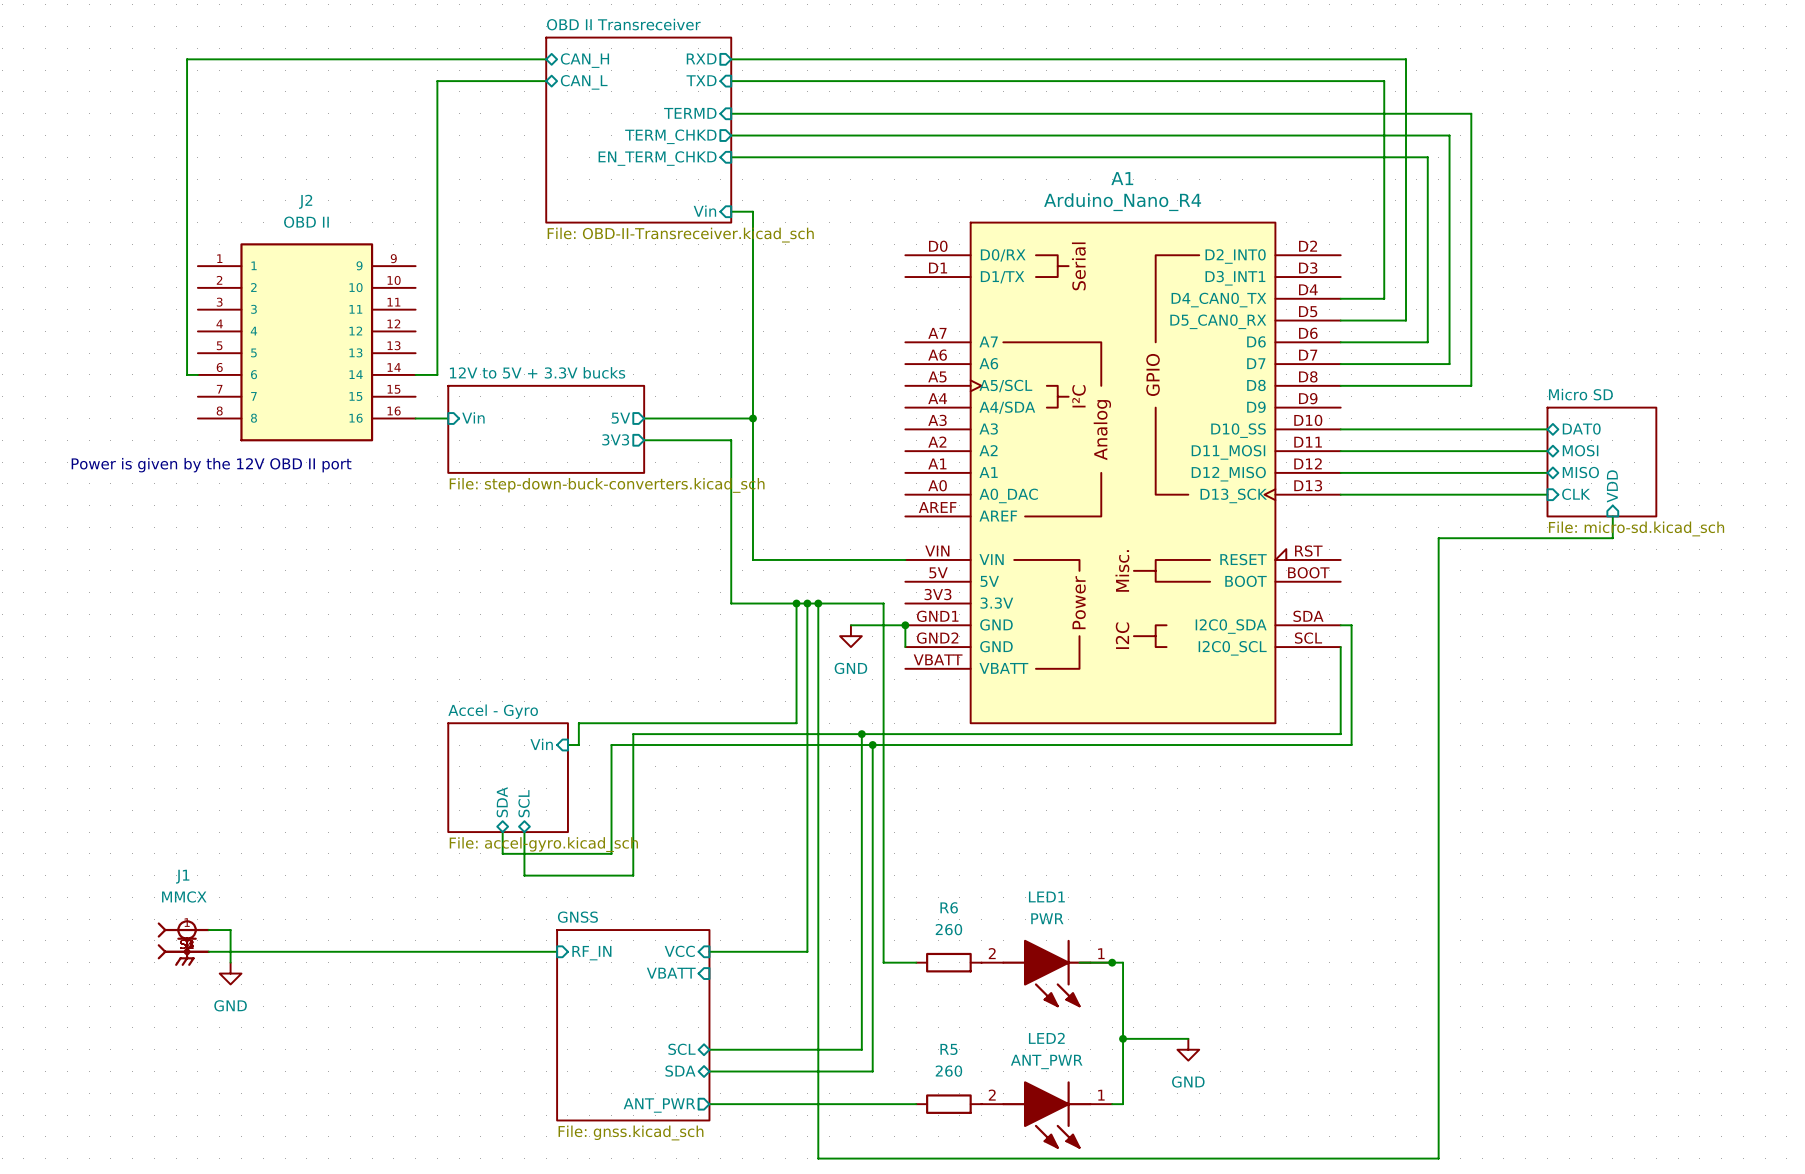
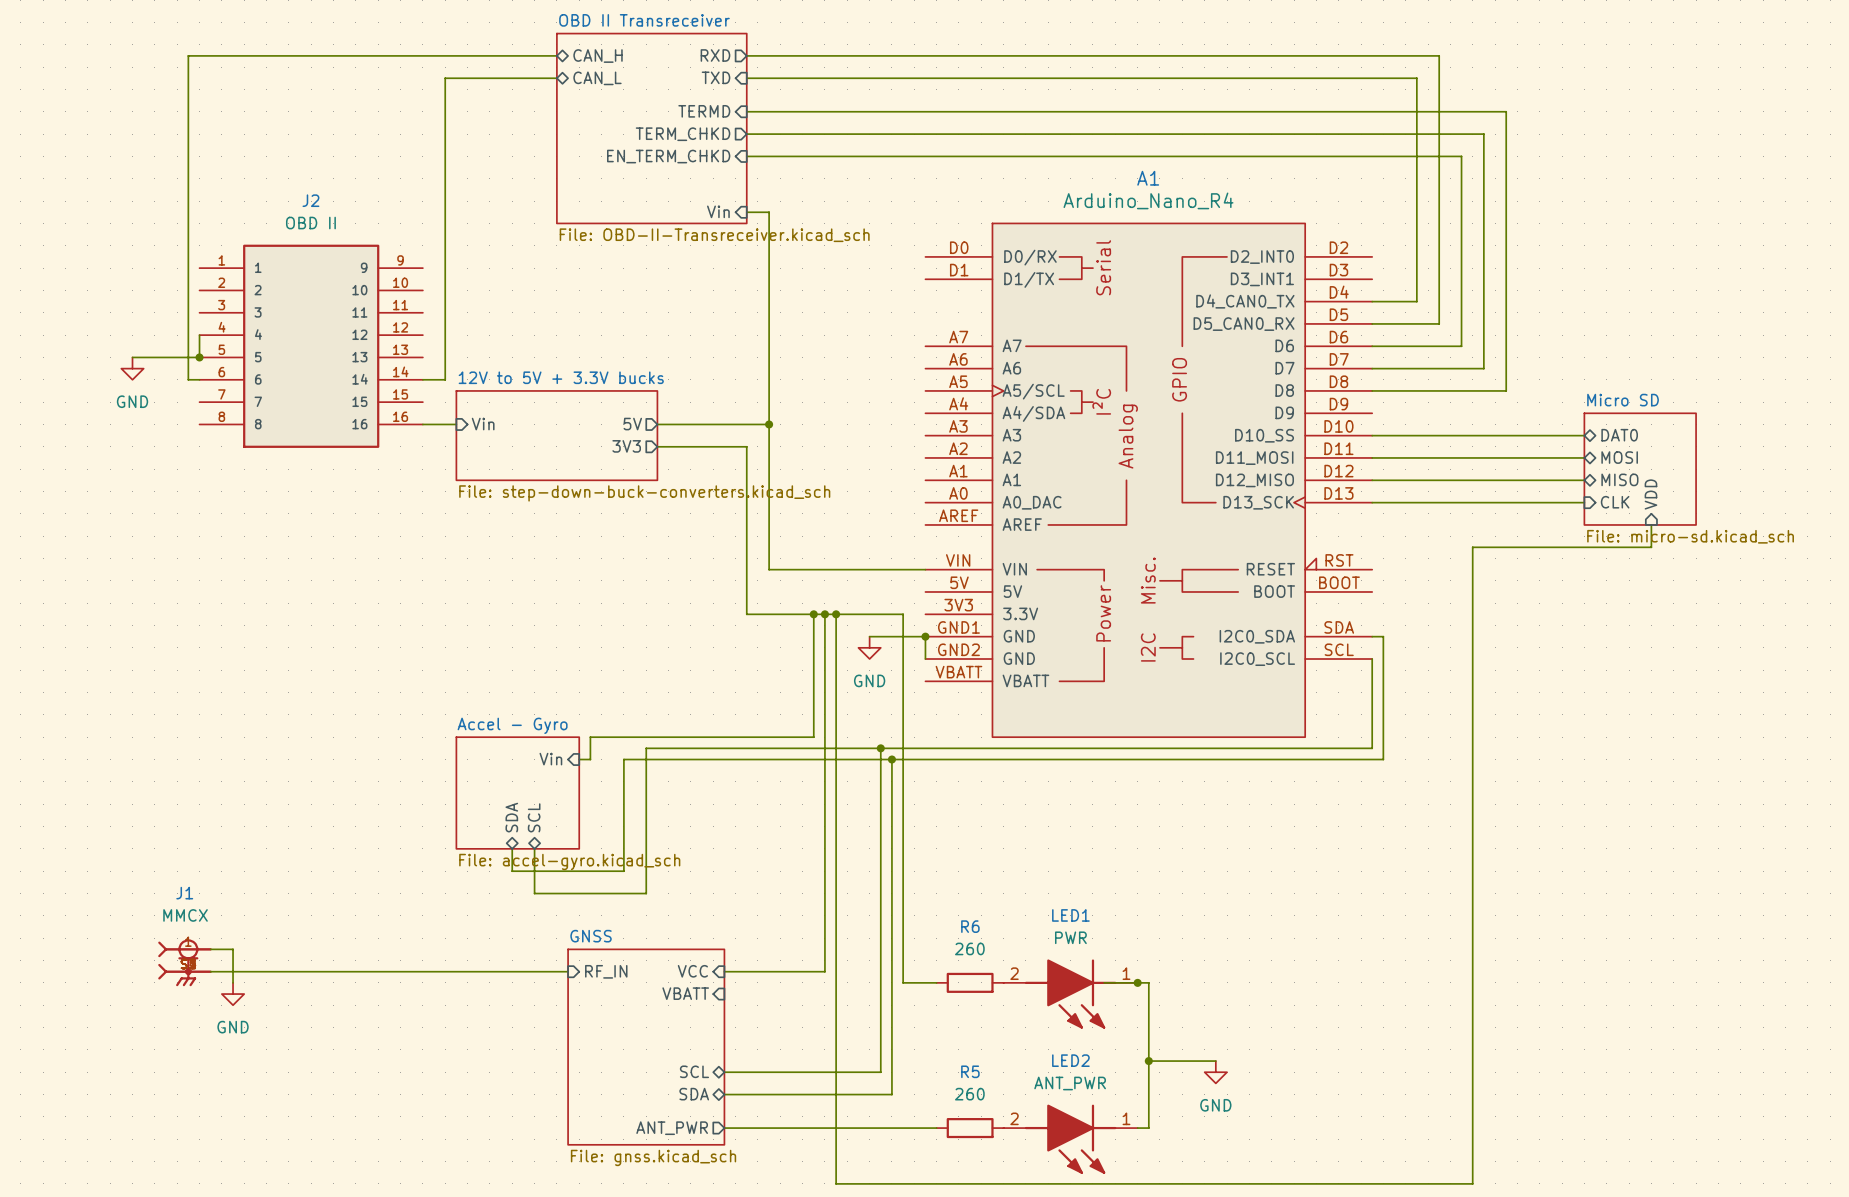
wire: none -> (199, 335) (199, 357) (132, 357)
junction: none -> (199, 357)
power symbol: none -> GND (132, 368)
text: Power is given by the 12V OBD II port (211, 465) -> none

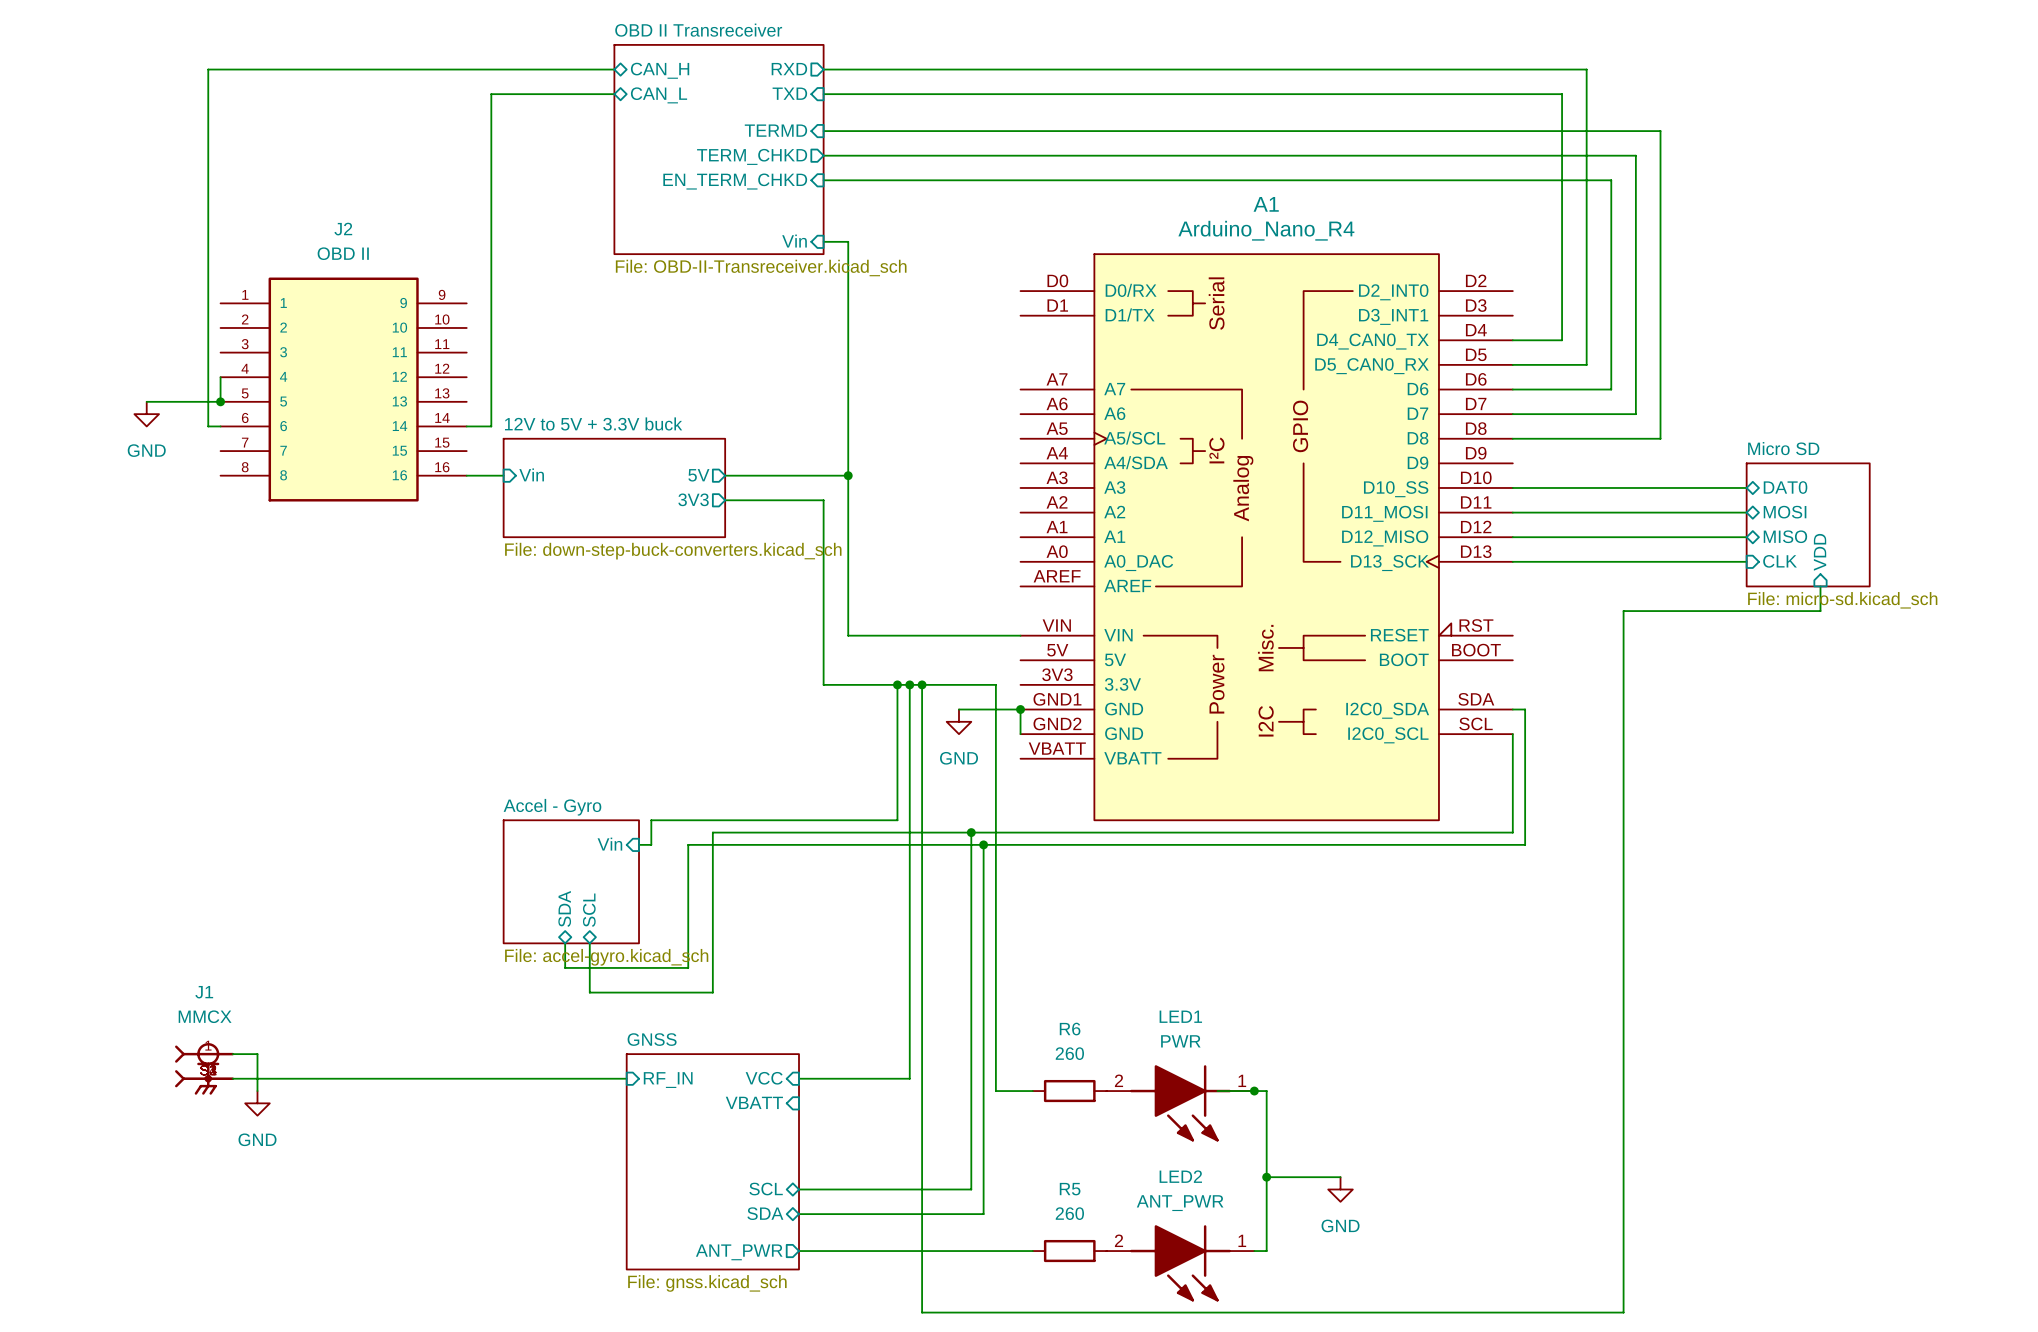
sheet 12V to 5V + 3.3V bucks name: 12V to 5V + 3.3V bucks (561, 377) -> 12V to 5V + 3.3V buck (593, 423)
sheet 12V to 5V + 3.3V bucks value: File: step-down-buck-converters.kicad_sch (644, 493) -> File: down-step-buck-converters.kicad_sch (673, 551)

